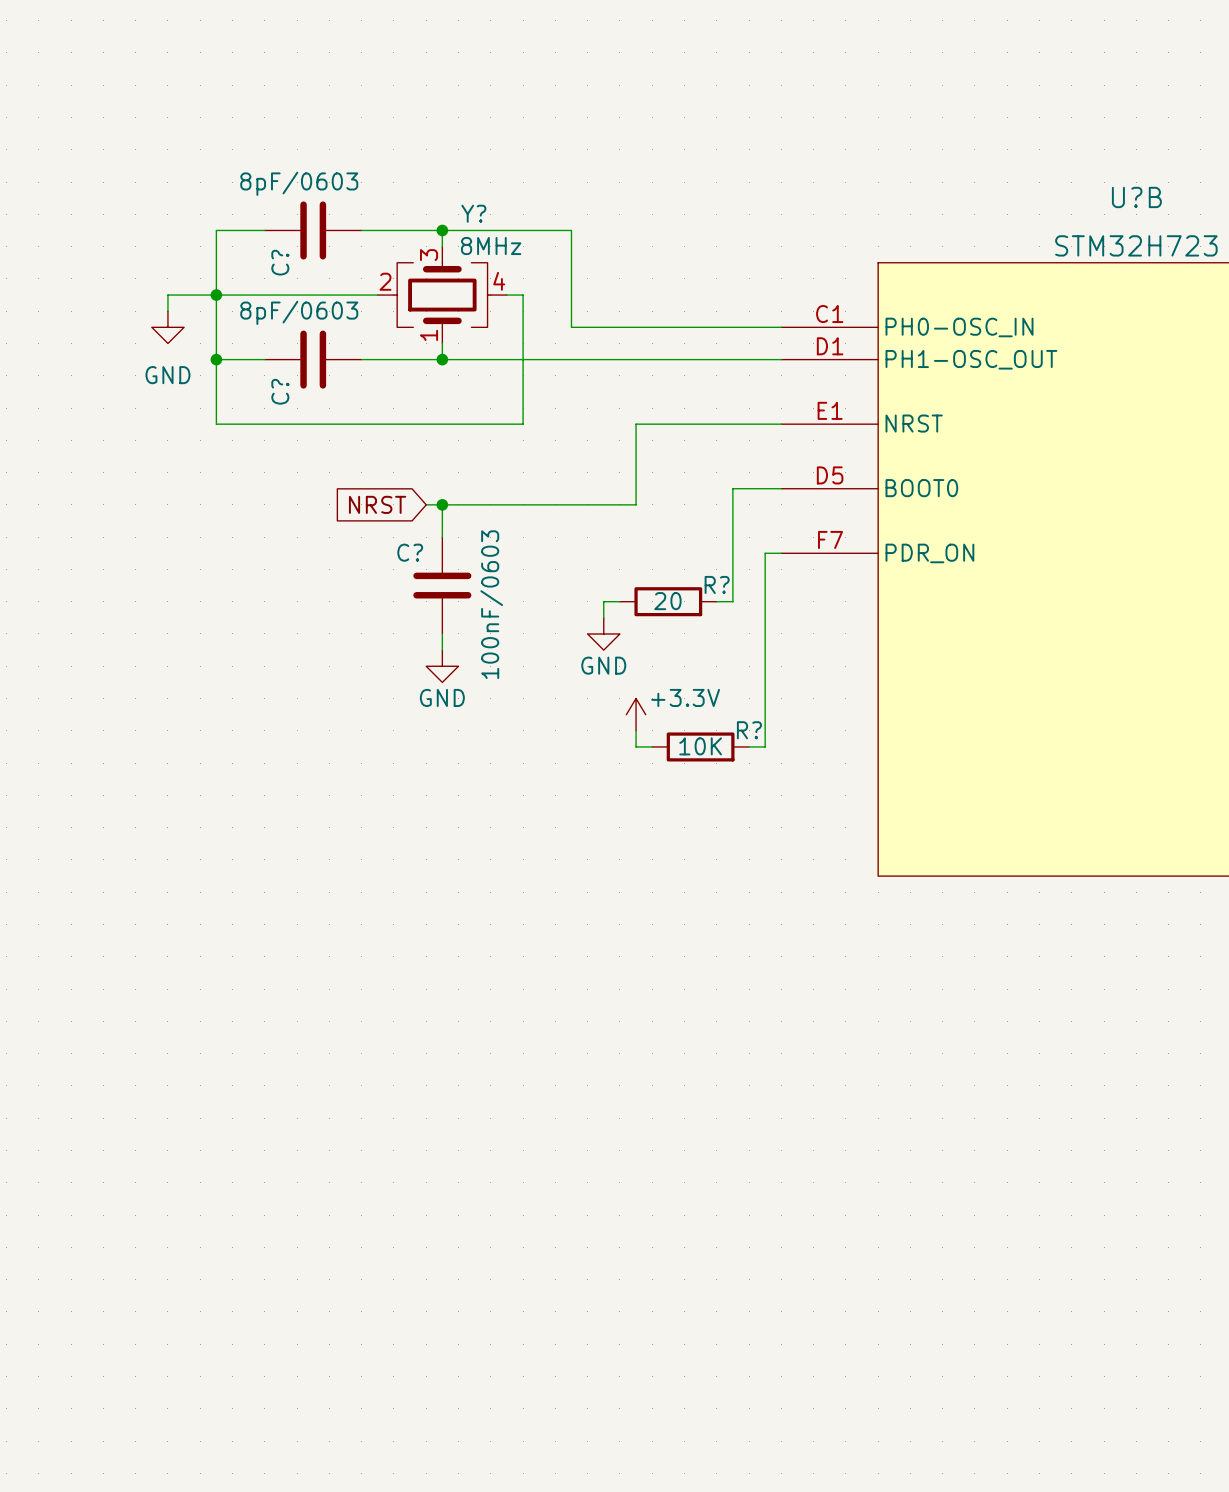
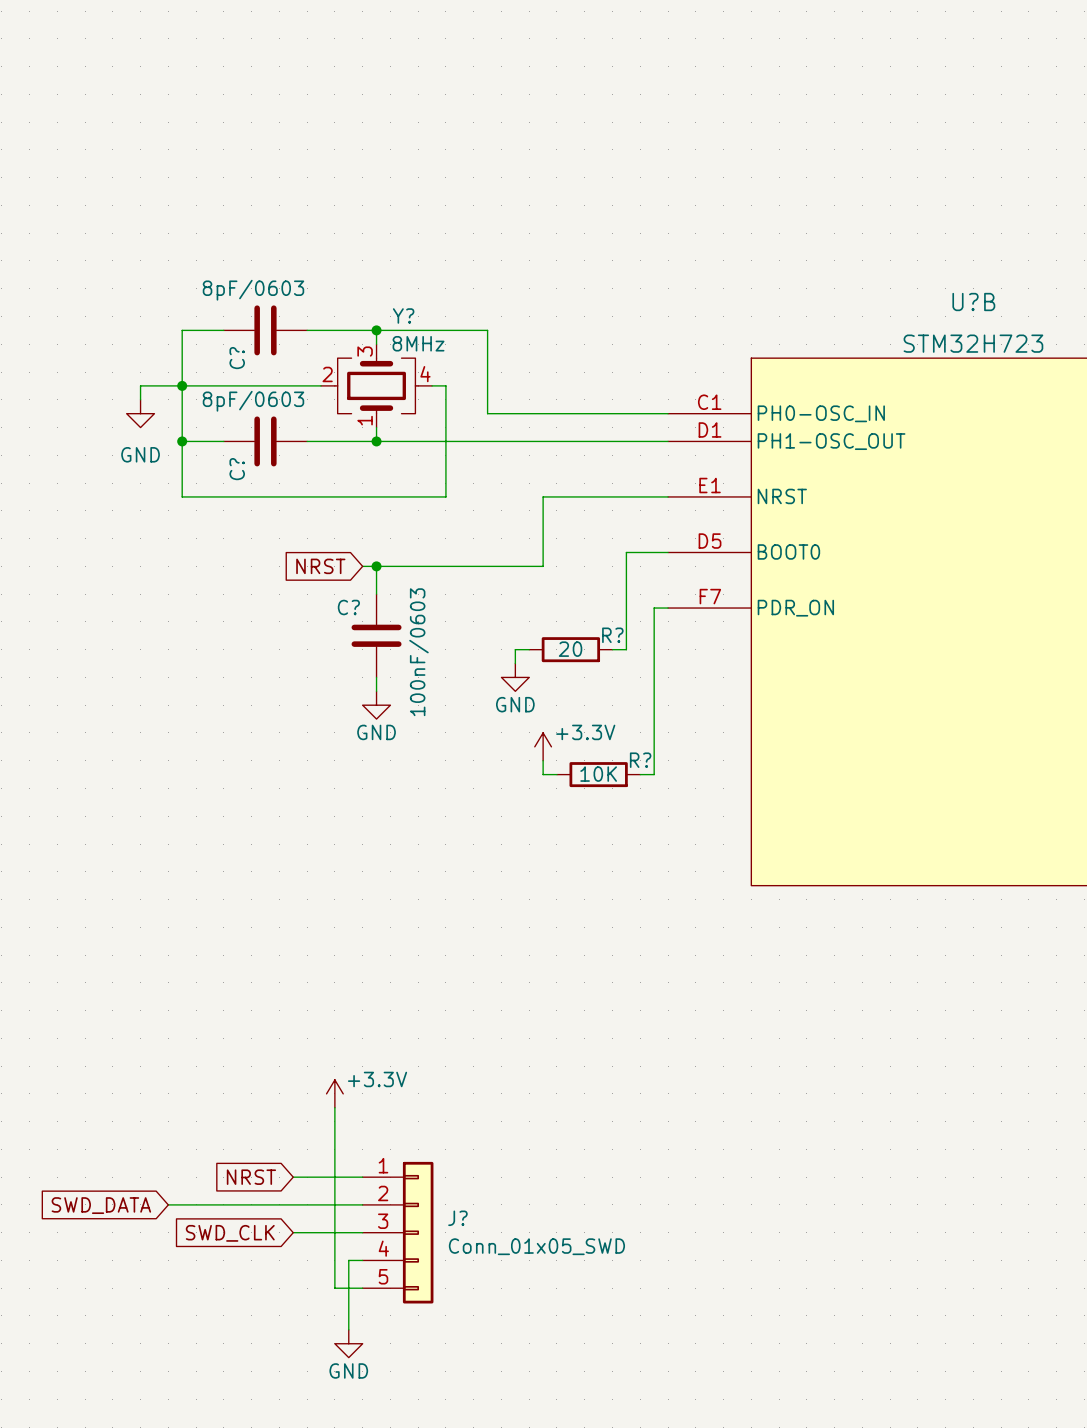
power symbol: none -> +3.3V (334, 1093)
wire: none -> (334, 1107) (334, 1288) (362, 1288)
global label: none -> NRST (251, 1177)
wire: none -> (293, 1177) (362, 1177)
wire: none -> (168, 1204) (362, 1204)
global label: none -> SWD_DATA (101, 1205)
wire: none -> (293, 1232) (362, 1232)
J?: none -> Conn_01x05_SWD (398, 1232)
global label: none -> SWD_CLK (230, 1233)
wire: none -> (362, 1260) (348, 1260) (348, 1329)
power symbol: none -> GND (348, 1343)

